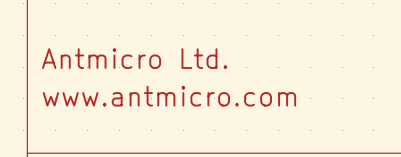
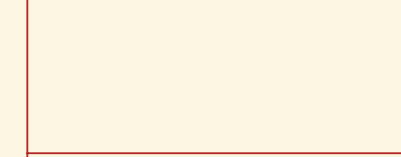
title block: Antmicro Ltd. (134, 58) -> none
title block: www.antmicro.com (169, 96) -> none

